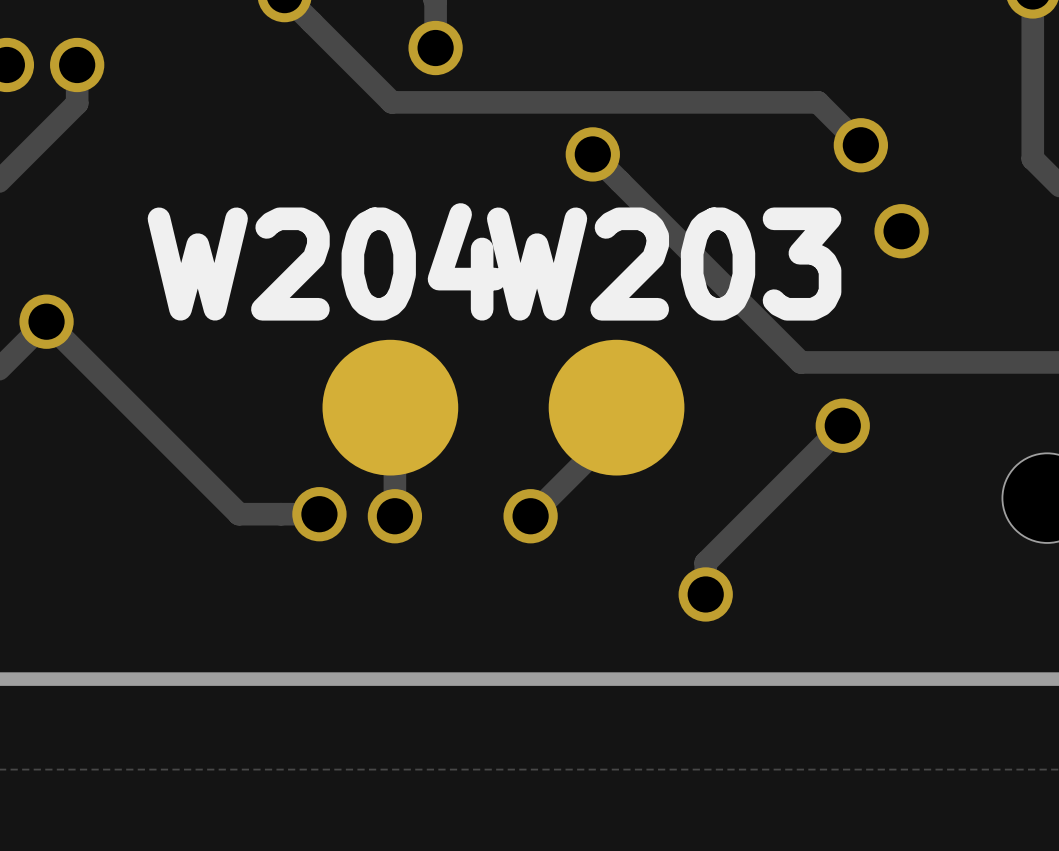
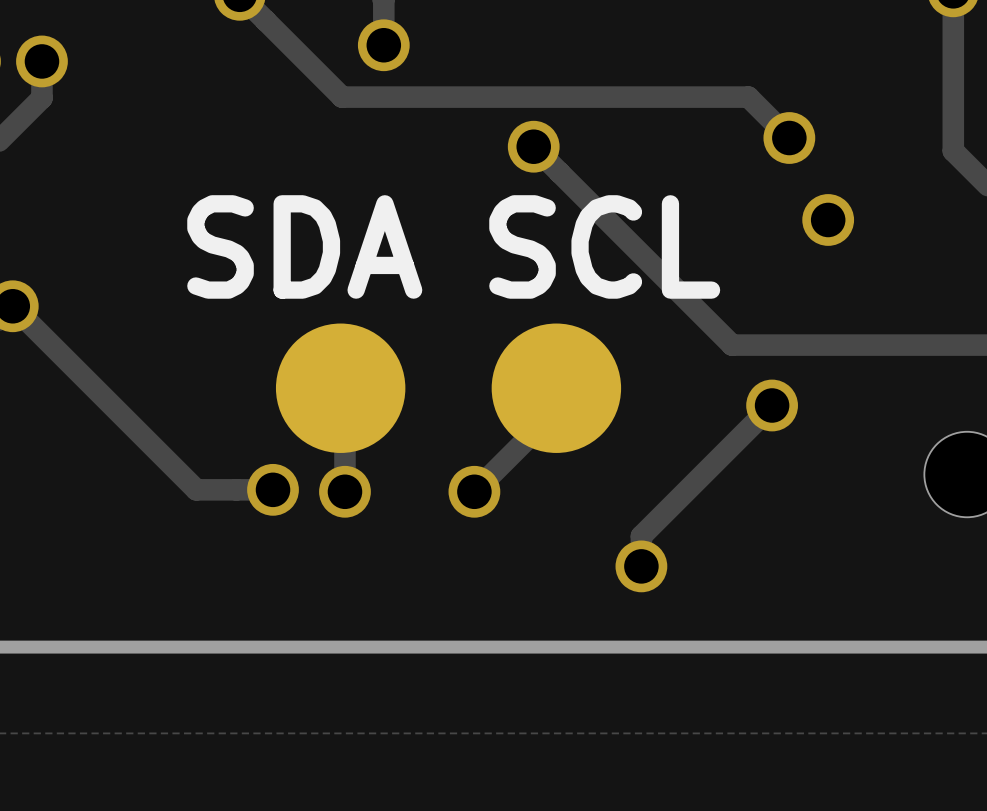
text: none -> SDA (304, 246)
text: none -> SCL (604, 246)
W204 name: W204 (327, 261) -> none
W203 name: W203 (664, 264) -> none

